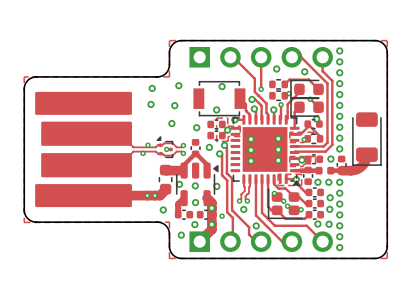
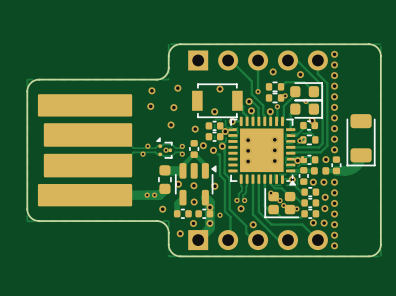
part rotation: 0° (307, 89) -> 180° (306, 91)
part rotation: 0° (307, 107) -> 180° (306, 109)
via: none -> (203, 145)
via: (209, 147) -> none
via: none -> (213, 150)
via: (219, 153) -> none

